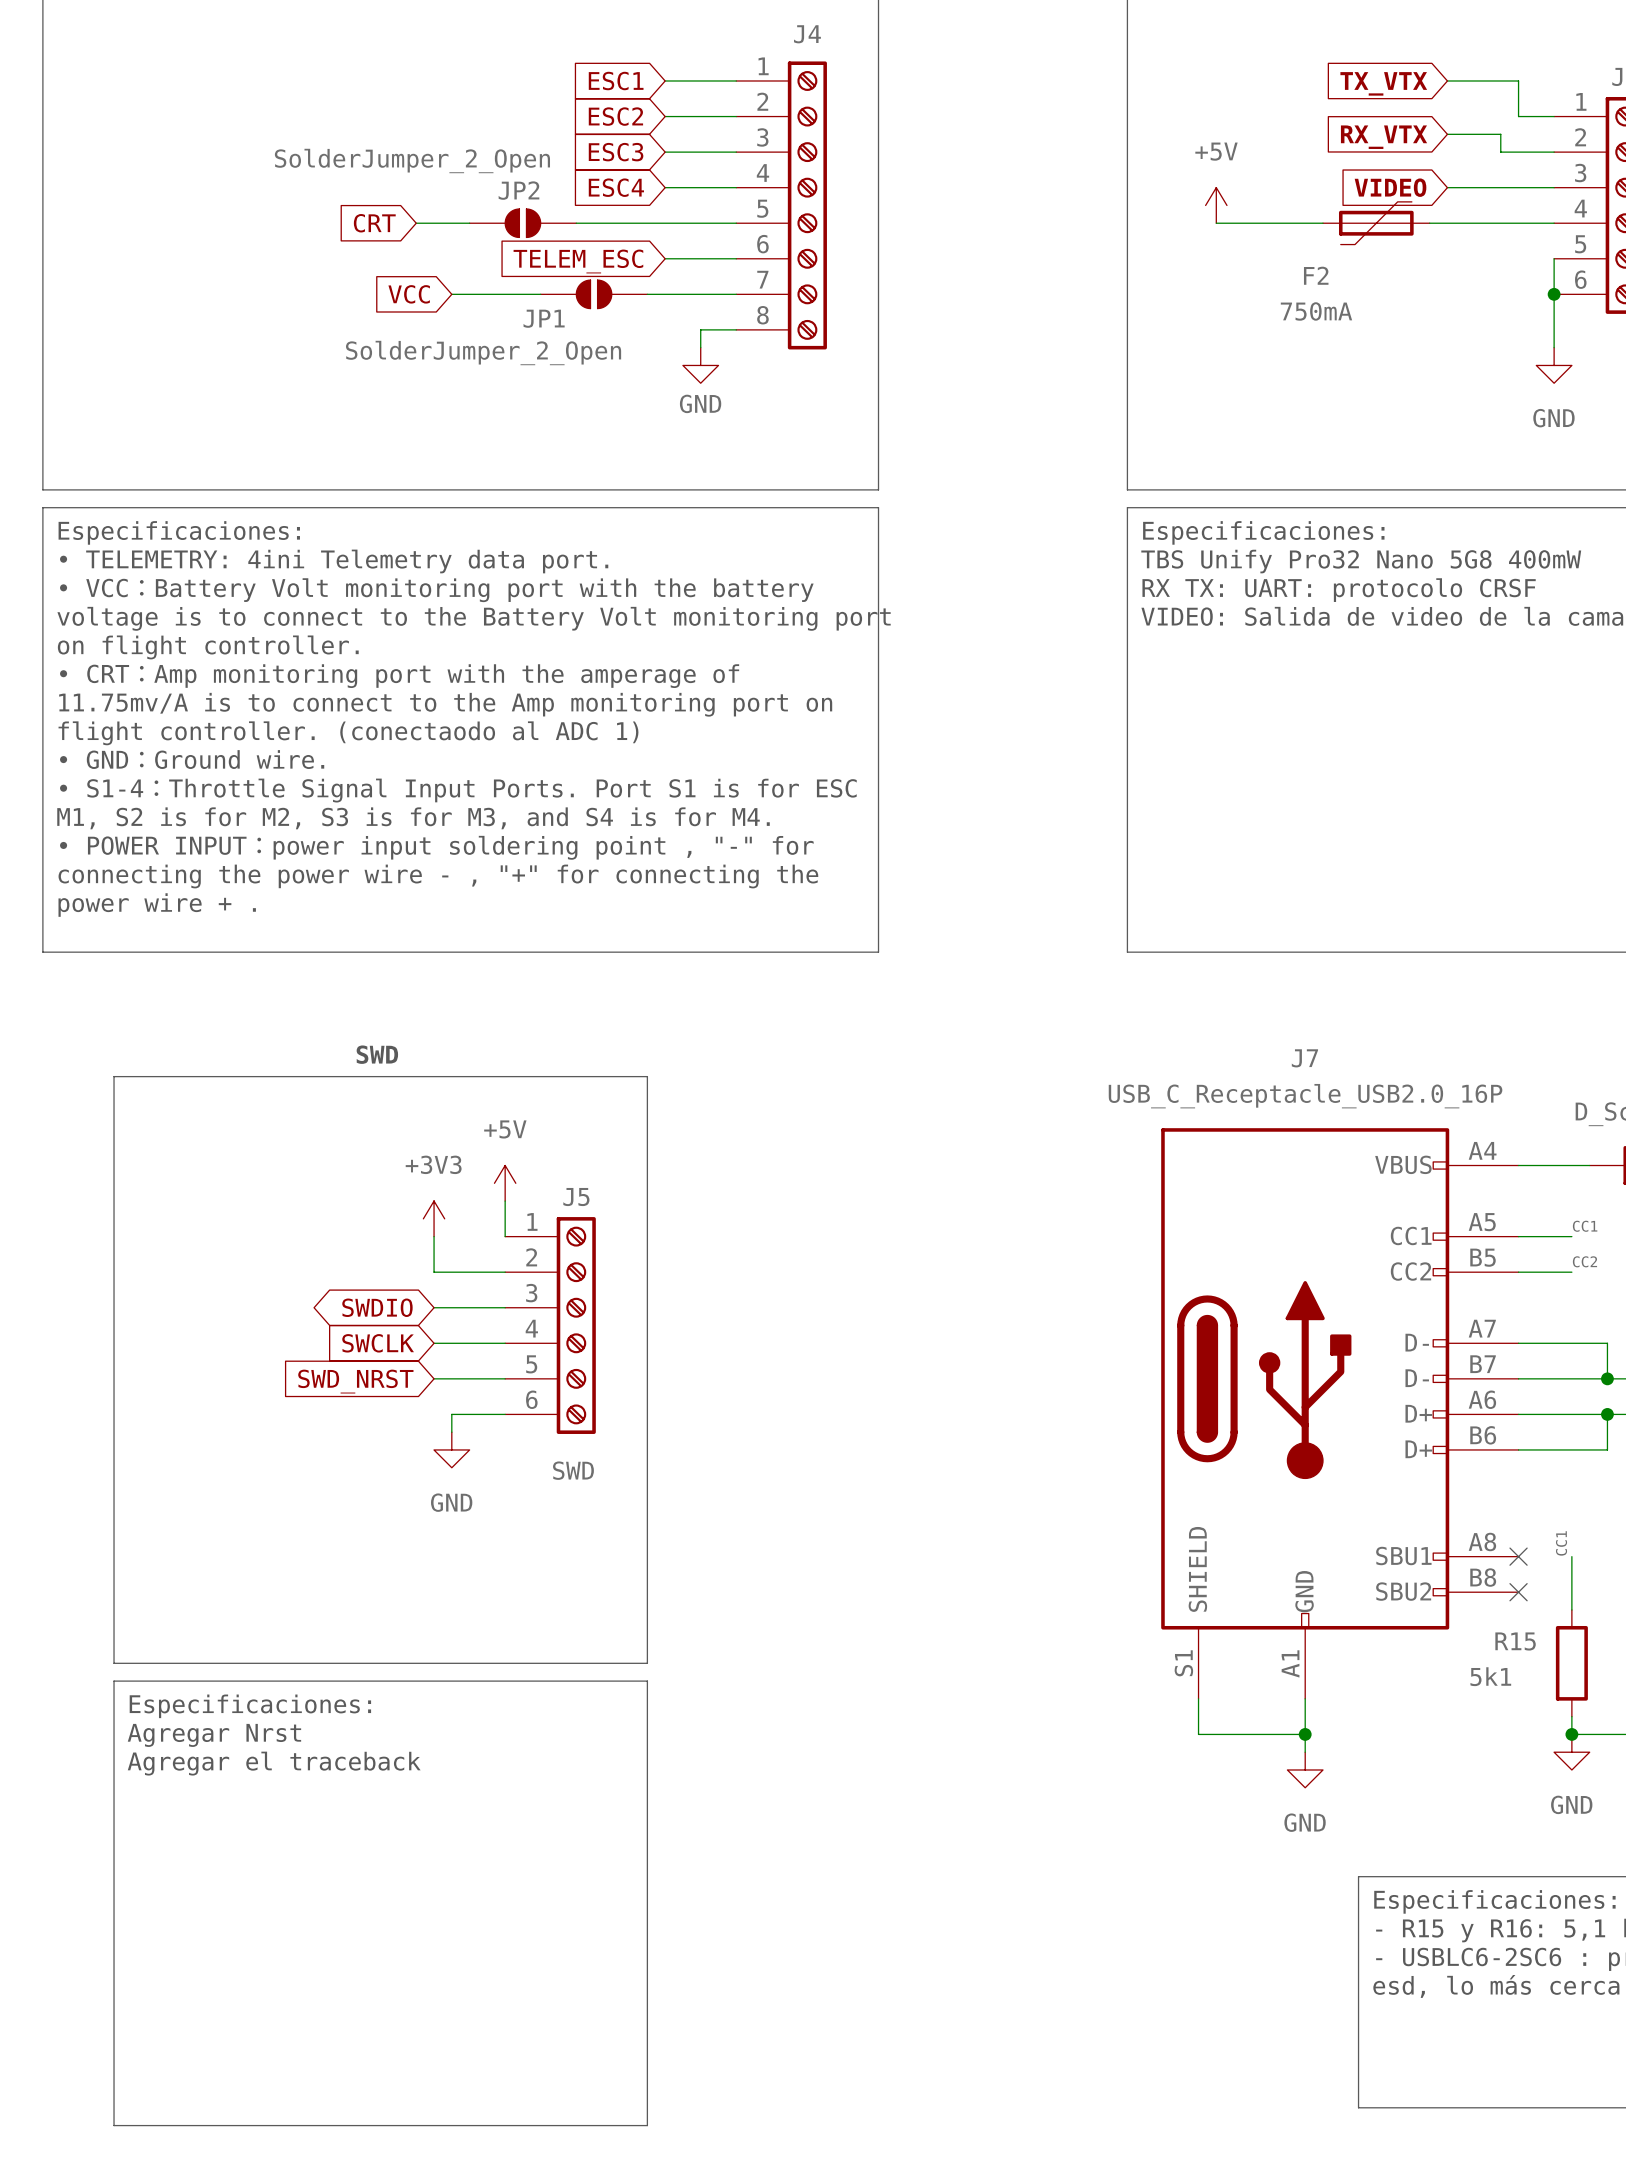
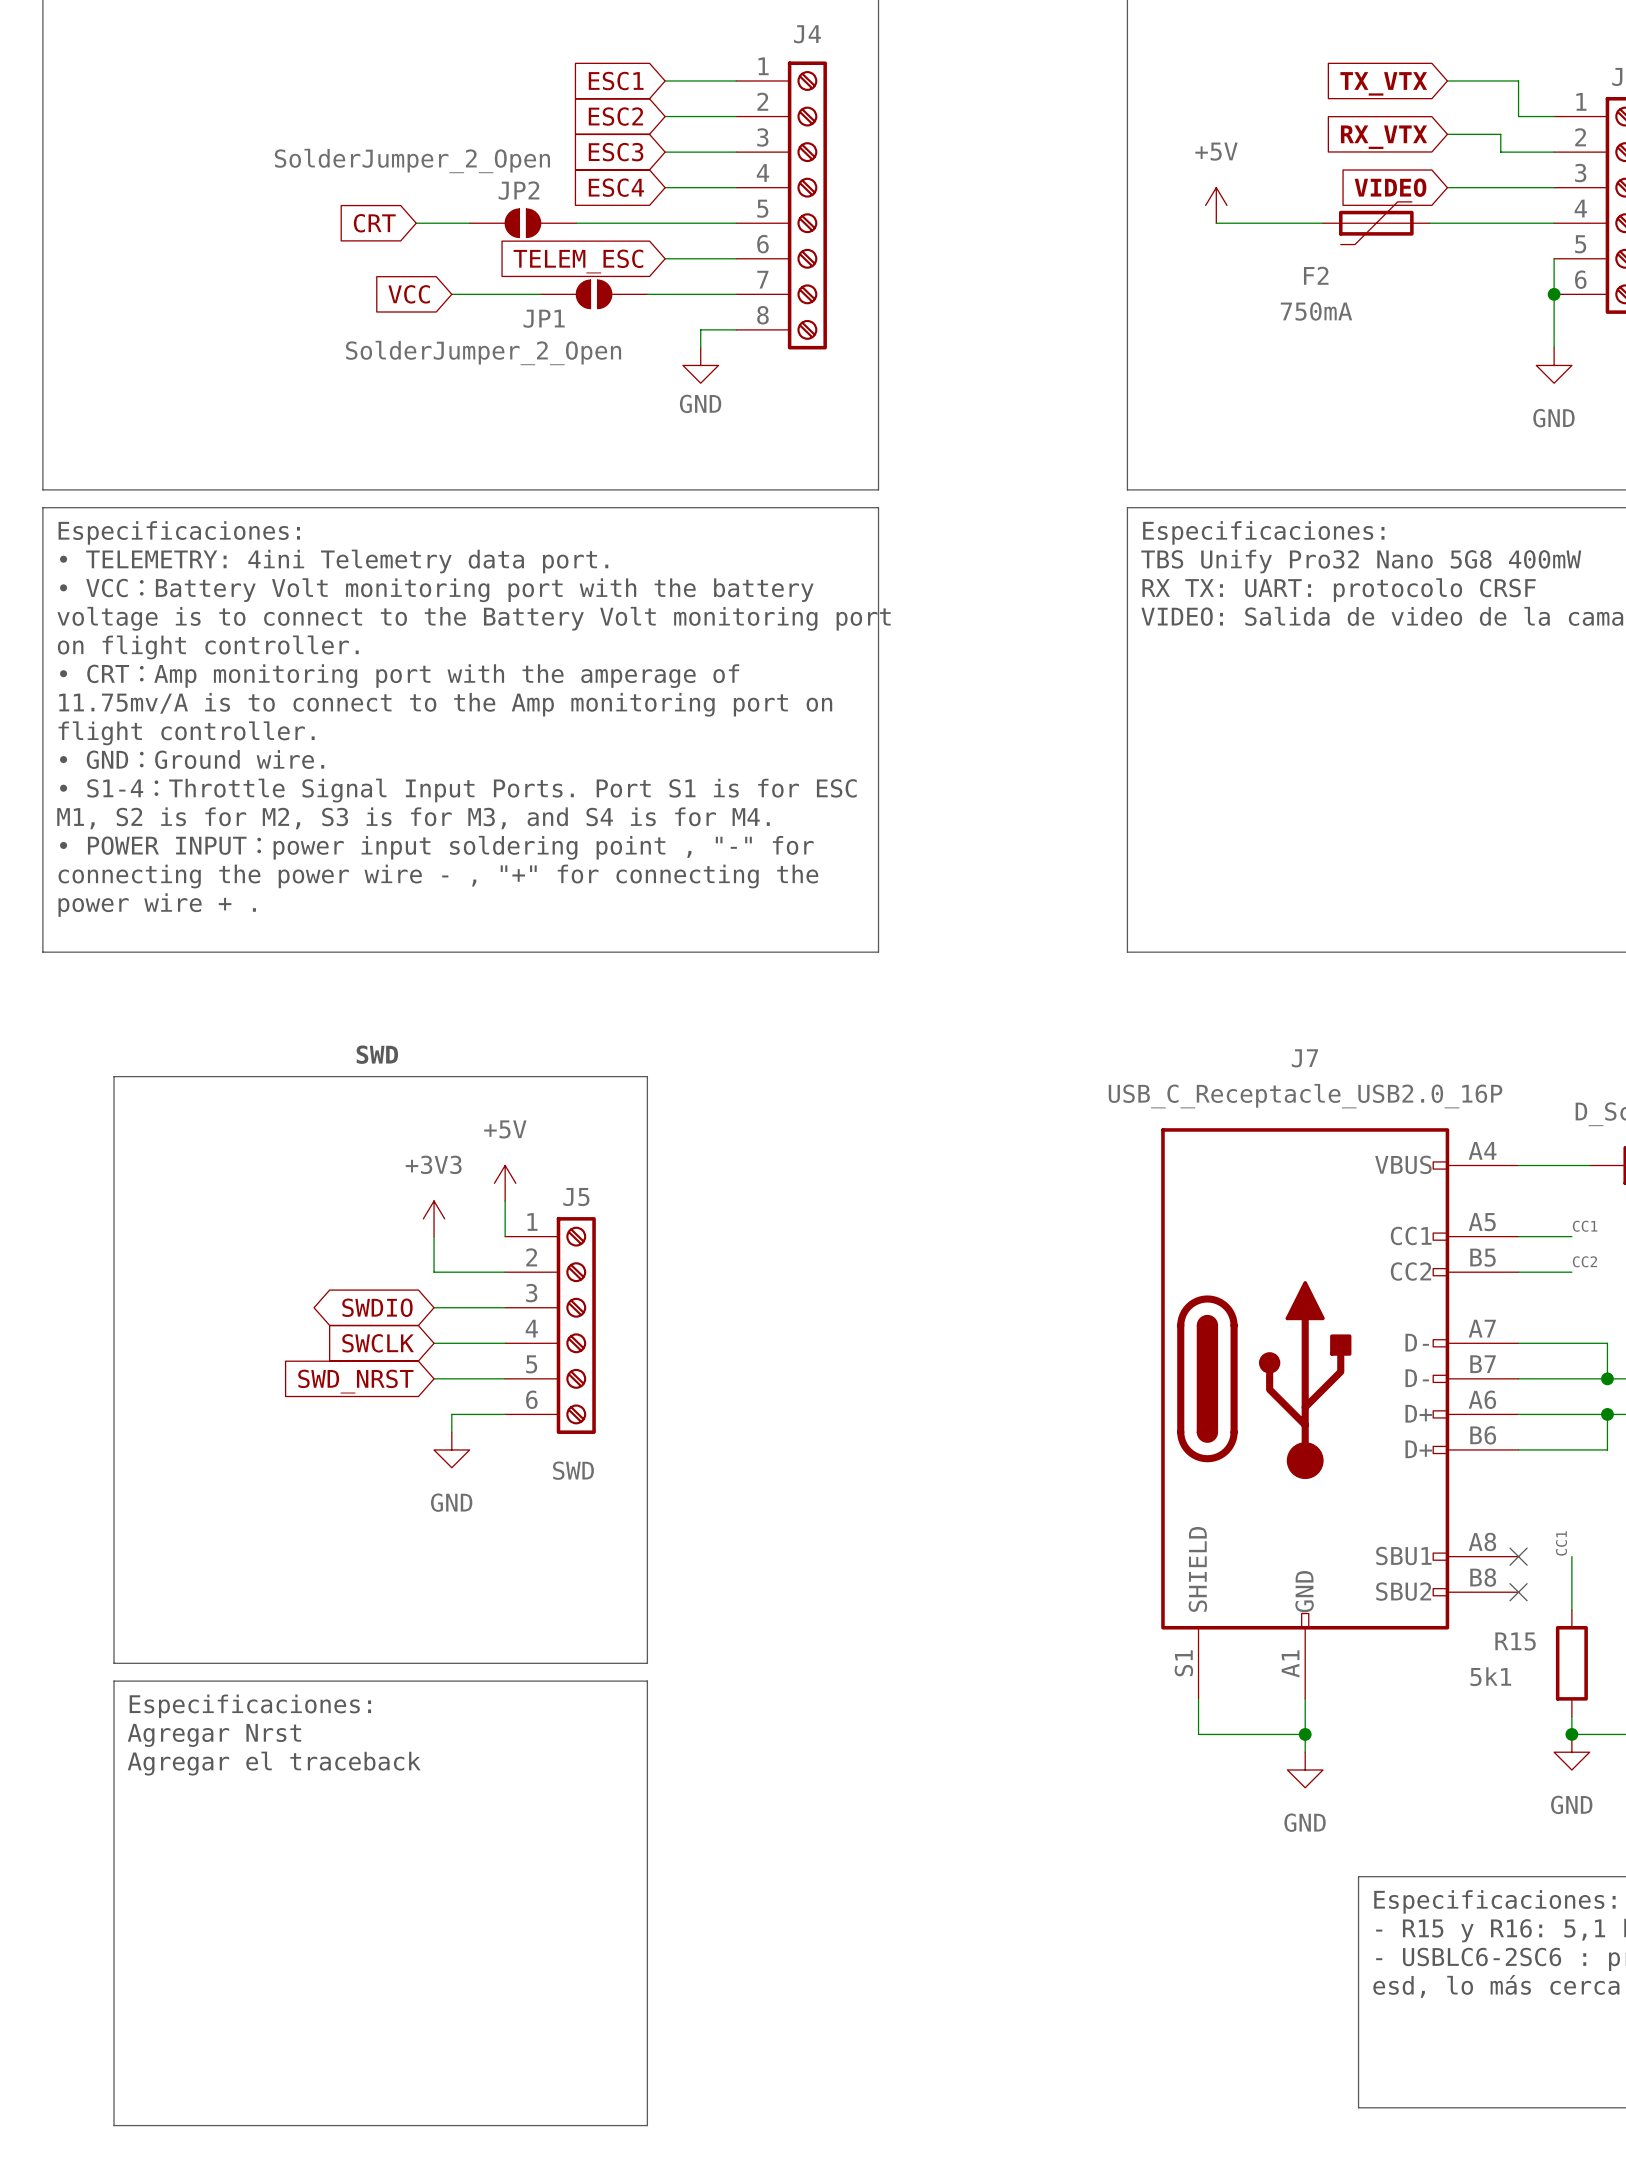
text: flight controller. (conectaodo al ADC 1) (348, 733) -> flight controller. (186, 733)

